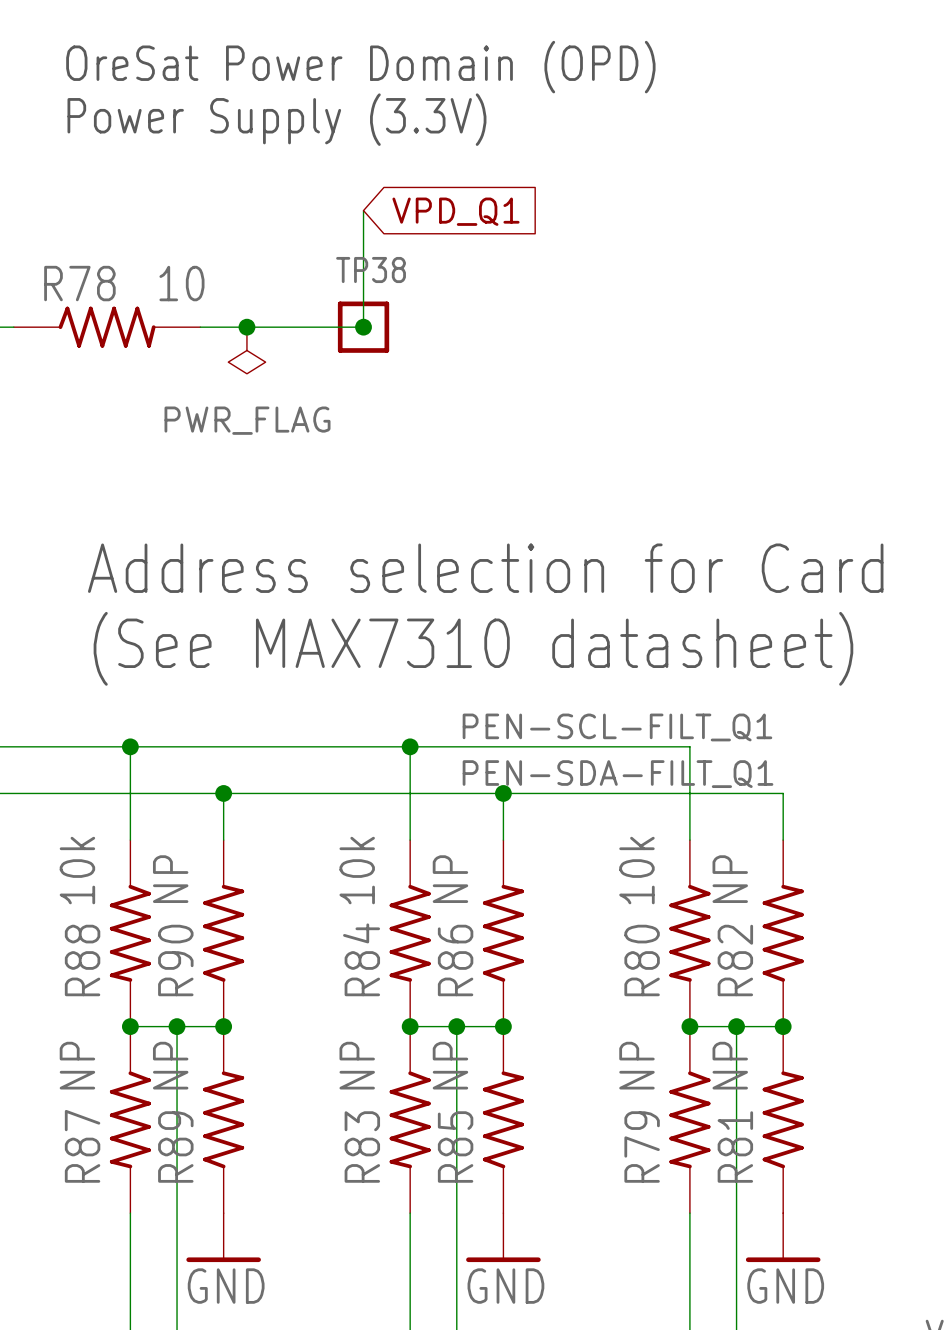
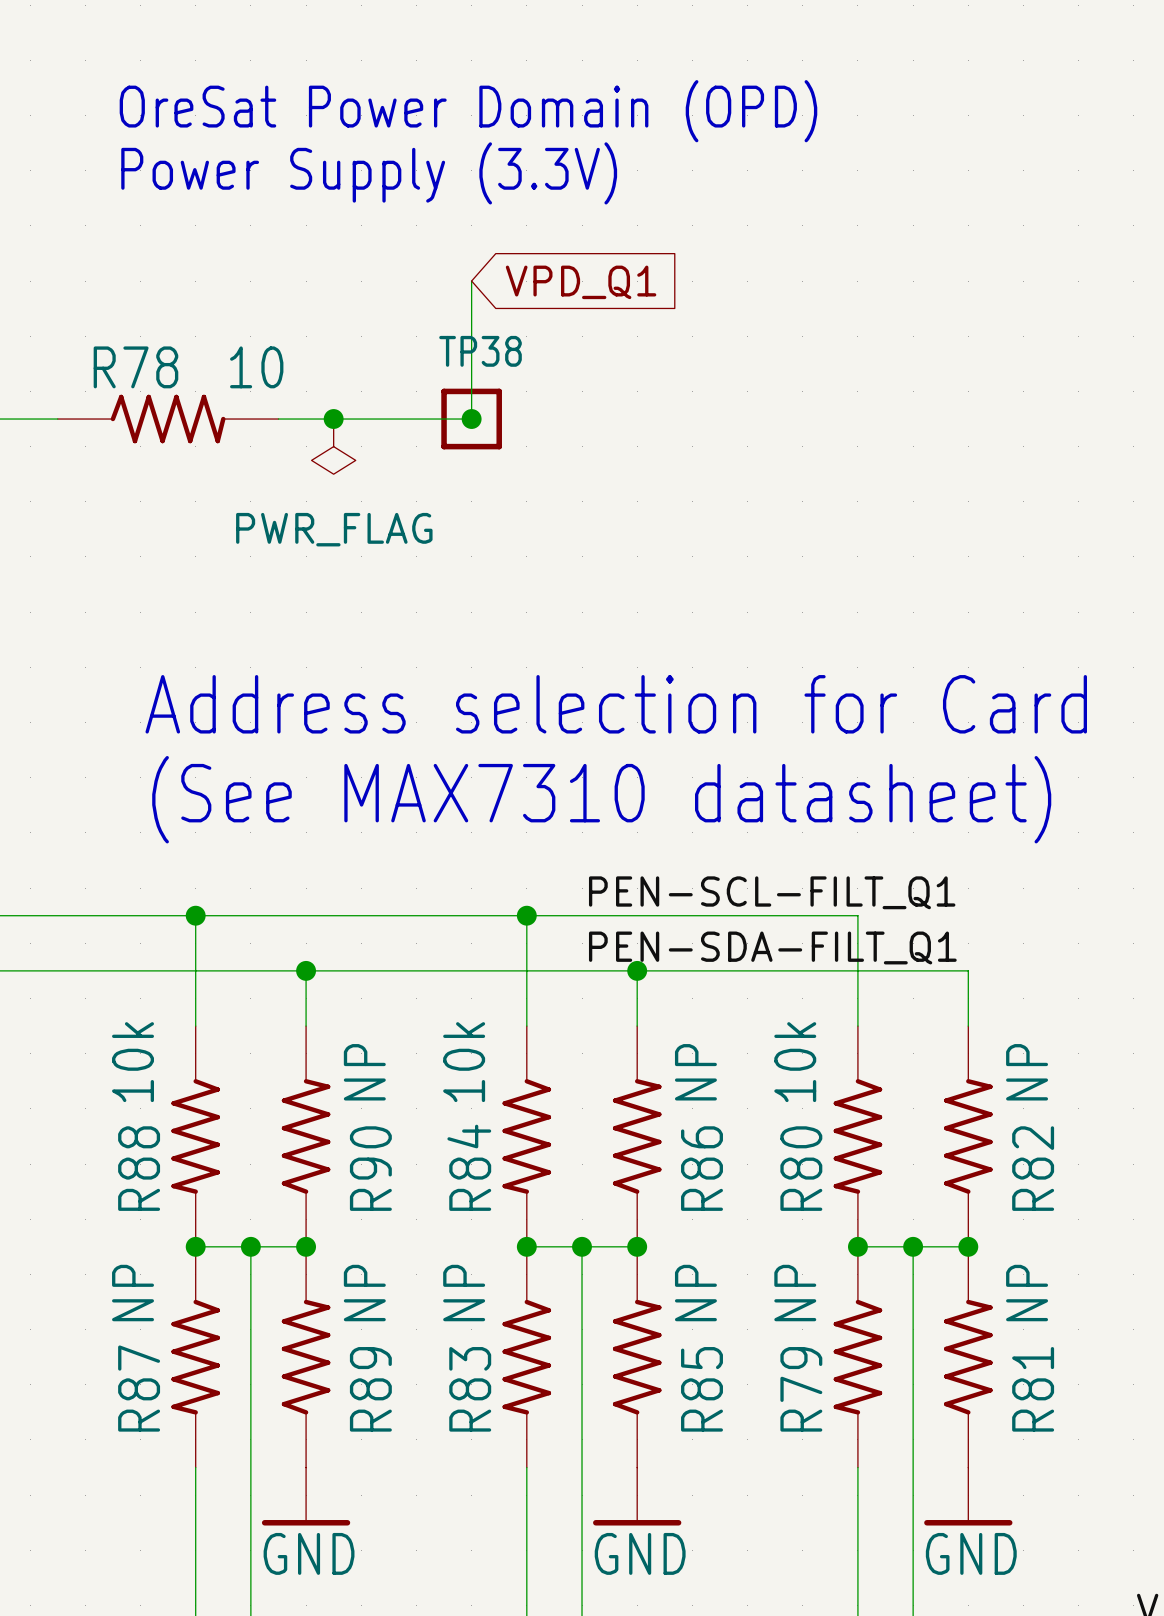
R90 value position: NP (170, 879) -> NP (364, 1072)
R86 value position: NP (450, 879) -> NP (695, 1072)
R82 value position: NP (730, 879) -> NP (1027, 1072)
R90 name position: R90 (175, 960) -> R90 (370, 1168)
R86 name position: R86 (455, 960) -> R86 (702, 1168)
R82 name position: R82 (735, 960) -> R82 (1033, 1168)
R89 value position: NP (170, 1065) -> NP (364, 1293)
R85 value position: NP (450, 1065) -> NP (695, 1293)
R81 value position: NP (730, 1065) -> NP (1027, 1293)
R89 name position: R89 (175, 1147) -> R89 (370, 1389)
R85 name position: R85 (455, 1147) -> R85 (702, 1389)
R81 name position: R81 (735, 1147) -> R81 (1033, 1389)

